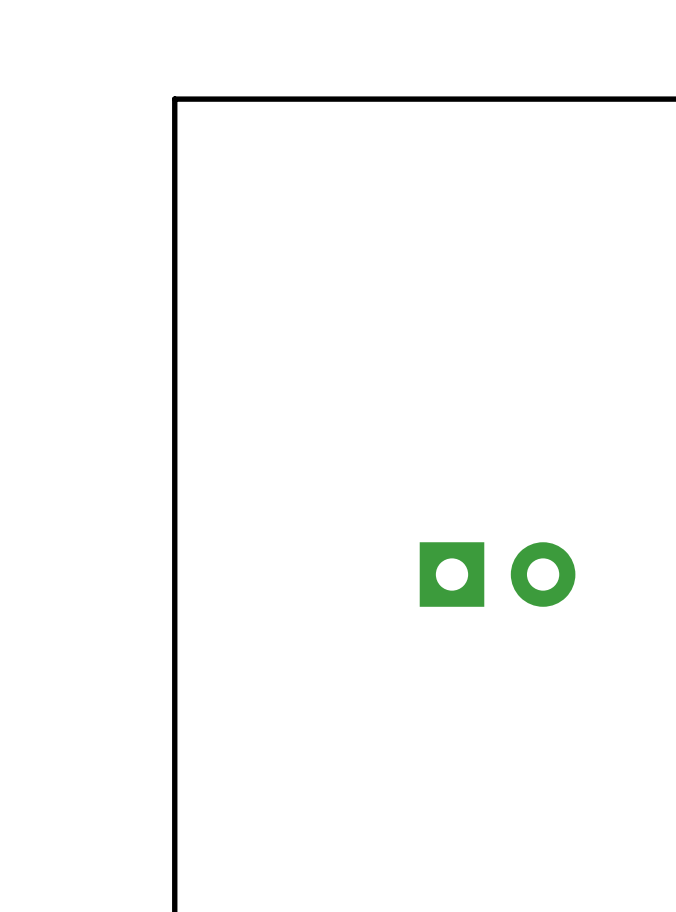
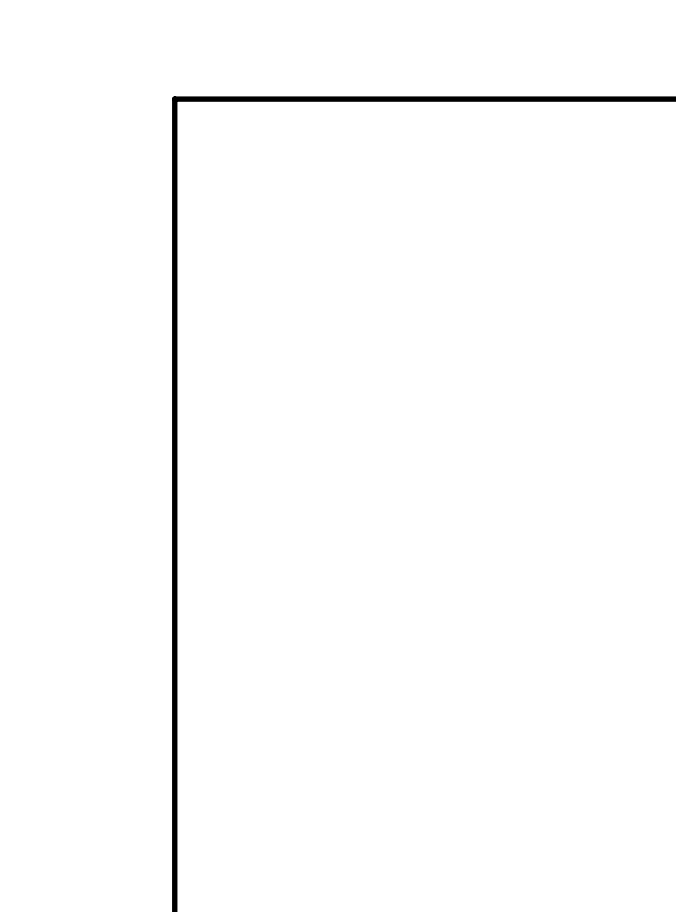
part: (497, 574) -> none

